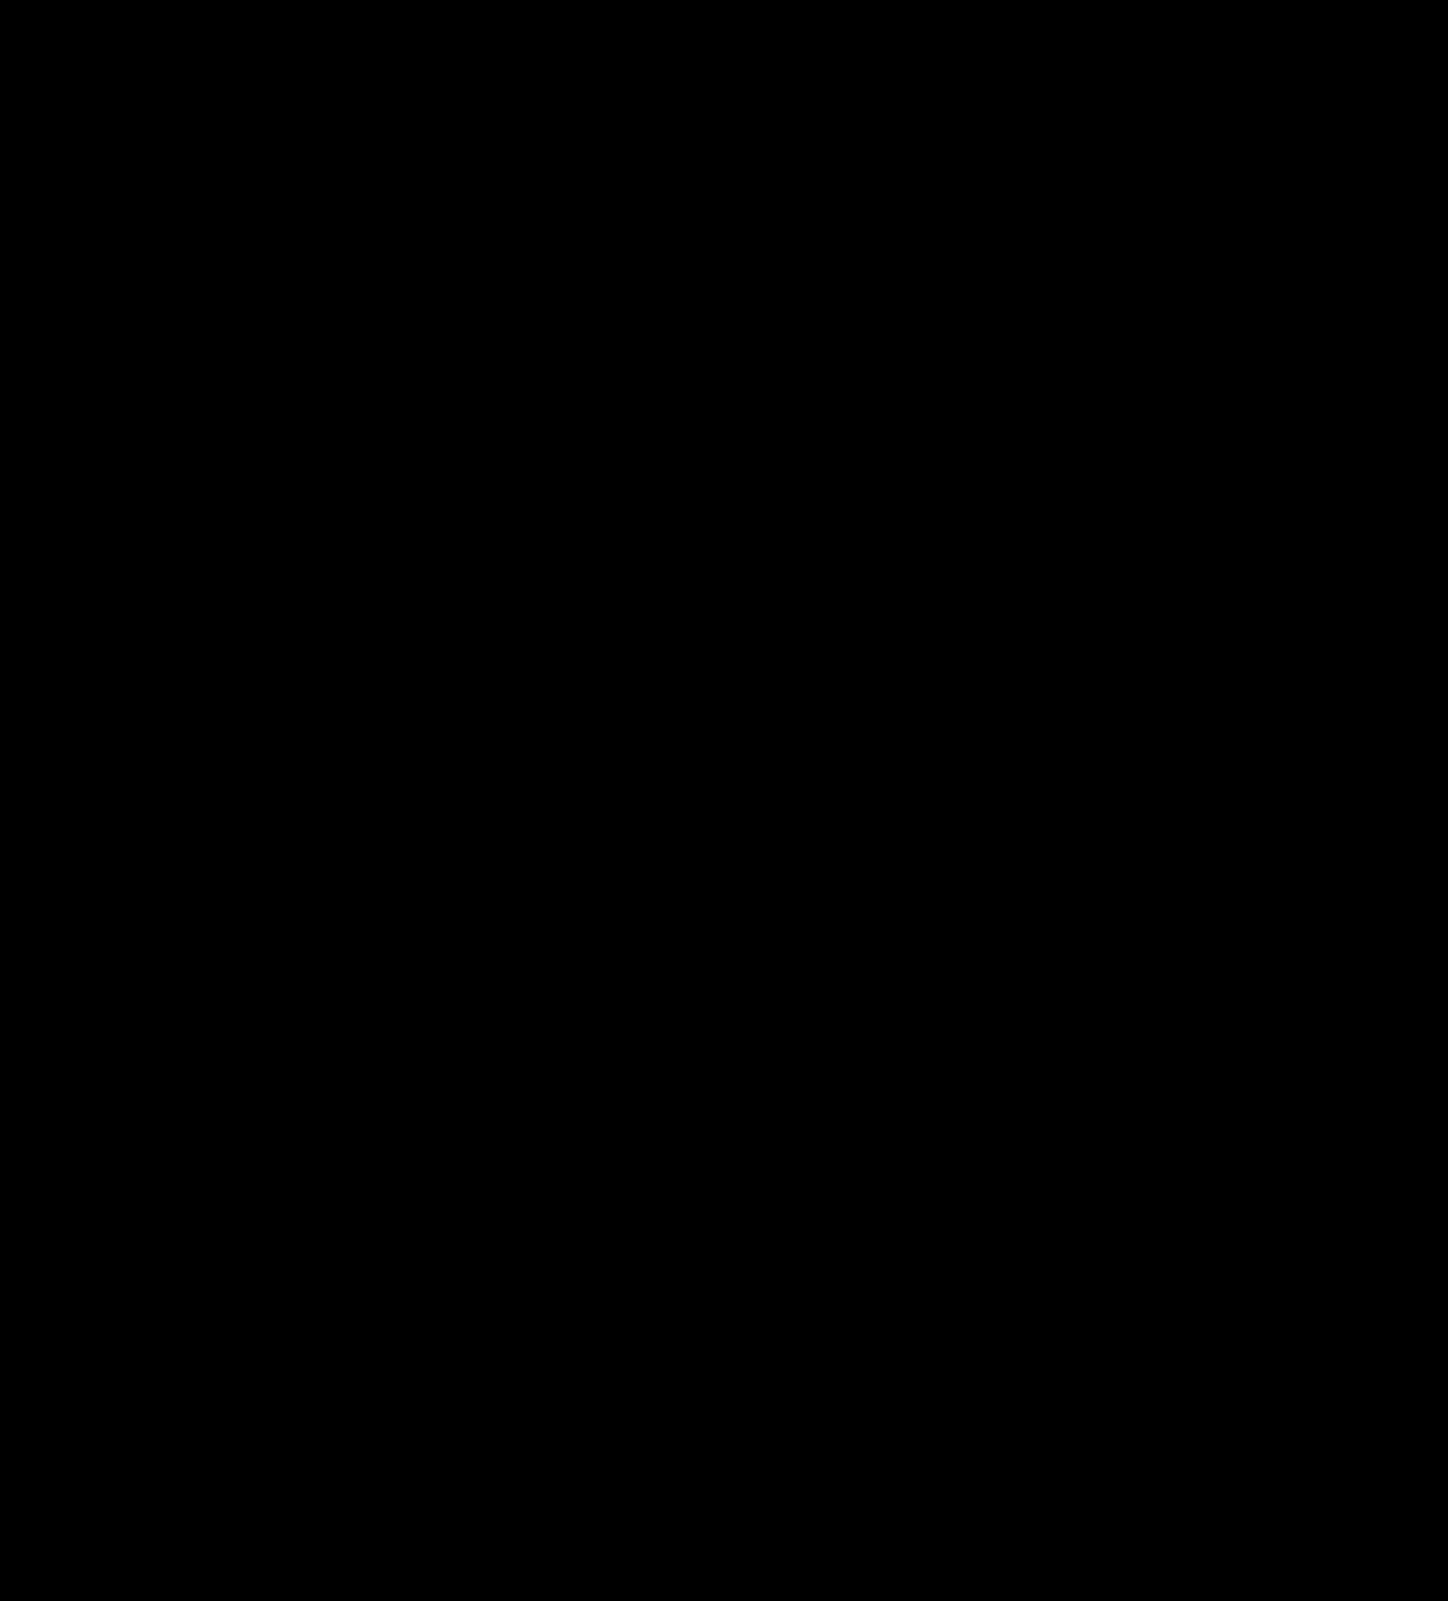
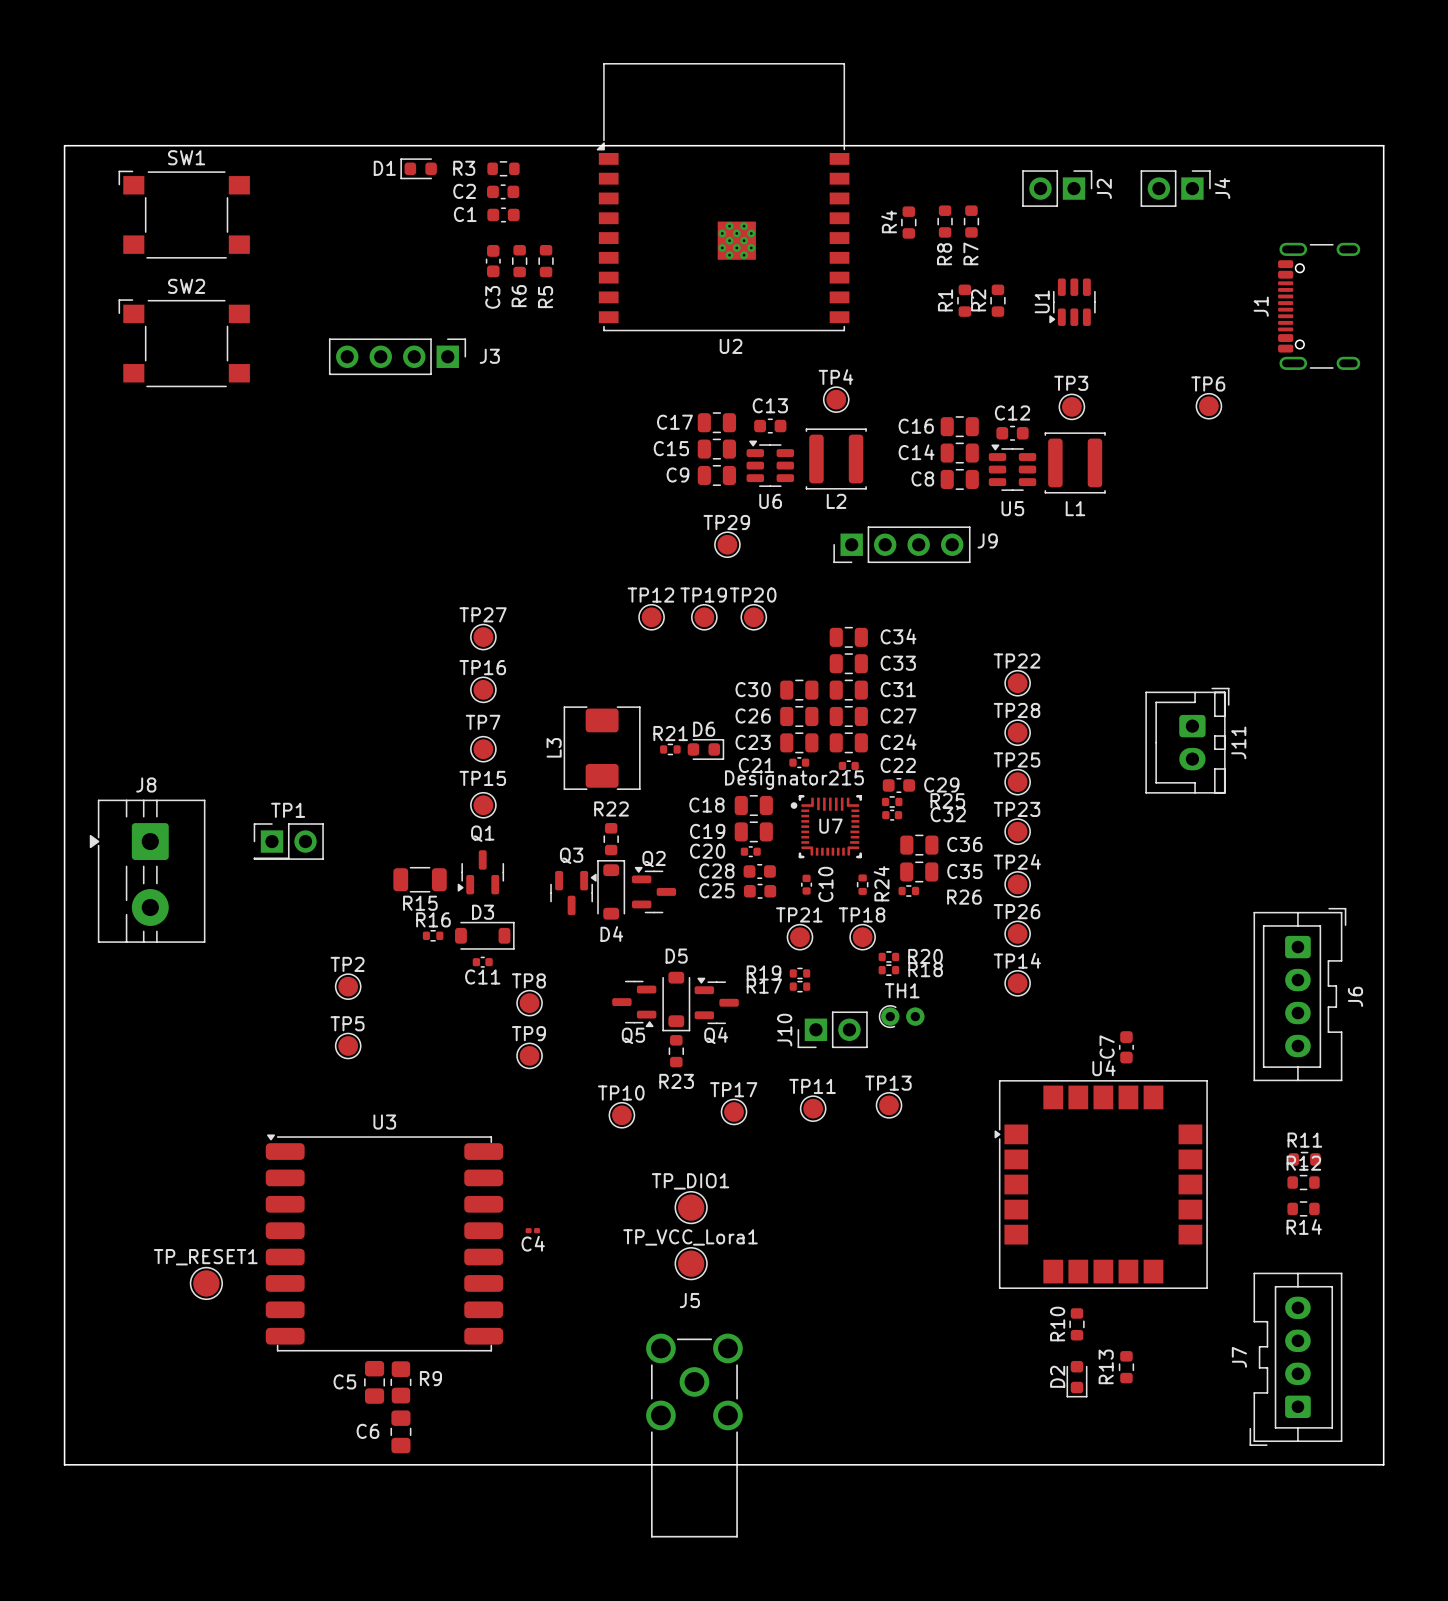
board edge: none -> (64, 145) (1383, 145) (1383, 1464) (64, 1464) (64, 145)
D1: none -> (418, 168)
R3: none -> (503, 168)
J2: none -> (1057, 188)
J4: none -> (1175, 188)
C2: none -> (503, 191)
U2: none -> (723, 197)
SW1: none -> (184, 214)
C1: none -> (503, 214)
R8: none -> (945, 221)
R7: none -> (971, 221)
R4: none -> (908, 222)
C3: none -> (493, 261)
R6: none -> (519, 261)
R5: none -> (546, 261)
R1: none -> (964, 300)
R2: none -> (997, 300)
U1: none -> (1072, 302)
J1: none -> (1319, 306)
SW2: none -> (184, 343)
J3: none -> (397, 356)
TP4: none -> (836, 399)
TP3: none -> (1071, 406)
TP6: none -> (1208, 406)
C17: none -> (716, 422)
C13: none -> (770, 426)
C16: none -> (959, 426)
C12: none -> (1012, 433)
C15: none -> (716, 449)
C14: none -> (959, 453)
L2: none -> (836, 459)
L1: none -> (1075, 462)
U6: none -> (770, 463)
U5: none -> (1012, 467)
C9: none -> (716, 475)
C8: none -> (959, 479)
TP29: none -> (727, 544)
J9: none -> (901, 544)
TP12: none -> (651, 617)
TP19: none -> (704, 617)
TP20: none -> (753, 617)
TP27: none -> (483, 637)
C34: none -> (848, 637)
C33: none -> (848, 663)
TP22: none -> (1017, 683)
TP16: none -> (483, 689)
C30: none -> (799, 690)
C31: none -> (848, 690)
C26: none -> (799, 716)
C27: none -> (848, 716)
TP28: none -> (1017, 732)
J11: none -> (1187, 740)
C23: none -> (799, 742)
C24: none -> (848, 742)
L3: none -> (602, 748)
TP7: none -> (483, 749)
R21: none -> (670, 749)
D6: none -> (705, 749)
C21: none -> (799, 762)
C22: none -> (848, 765)
TP25: none -> (1017, 782)
C29: none -> (898, 785)
R25: none -> (892, 801)
TP15: none -> (483, 805)
C18: none -> (753, 805)
C32: none -> (892, 815)
U7: none -> (826, 826)
C19: none -> (753, 831)
TP23: none -> (1017, 831)
R22: none -> (611, 839)
TP1: none -> (288, 841)
C36: none -> (919, 845)
C20: none -> (750, 851)
J8: none -> (147, 871)
C28: none -> (759, 871)
C35: none -> (919, 871)
Q1: none -> (480, 872)
R15: none -> (420, 879)
C10: none -> (806, 884)
R24: none -> (862, 884)
TP24: none -> (1017, 884)
D4: none -> (611, 889)
Q2: none -> (654, 890)
C25: none -> (760, 891)
R26: none -> (908, 891)
Q3: none -> (573, 893)
TP26: none -> (1017, 933)
R16: none -> (433, 935)
D3: none -> (484, 935)
TP21: none -> (799, 937)
TP18: none -> (862, 937)
R20: none -> (888, 956)
C11: none -> (482, 962)
R18: none -> (888, 970)
R19: none -> (799, 973)
TP14: none -> (1017, 983)
TP2: none -> (348, 986)
R17: none -> (799, 986)
J6: none -> (1299, 994)
Q4: none -> (716, 1000)
D5: none -> (676, 1001)
TP8: none -> (529, 1003)
Q5: none -> (634, 1003)
TH1: none -> (901, 1016)
J10: none -> (832, 1029)
TP5: none -> (348, 1046)
C7: none -> (1126, 1047)
R23: none -> (676, 1051)
TP9: none -> (529, 1055)
TP13: none -> (889, 1105)
TP11: none -> (813, 1108)
TP17: none -> (734, 1111)
TP10: none -> (621, 1115)
R11: none -> (1304, 1159)
R12: none -> (1303, 1182)
U4: none -> (1101, 1184)
TP_DIO1: none -> (691, 1207)
R14: none -> (1303, 1208)
C4: none -> (532, 1230)
U3: none -> (384, 1242)
TP_VCC_Lora1: none -> (691, 1263)
TP_RESET1: none -> (206, 1283)
R10: none -> (1076, 1324)
J7: none -> (1295, 1359)
R13: none -> (1126, 1367)
D2: none -> (1076, 1379)
C5: none -> (374, 1382)
R9: none -> (400, 1382)
C6: none -> (400, 1431)
J5: none -> (694, 1435)

